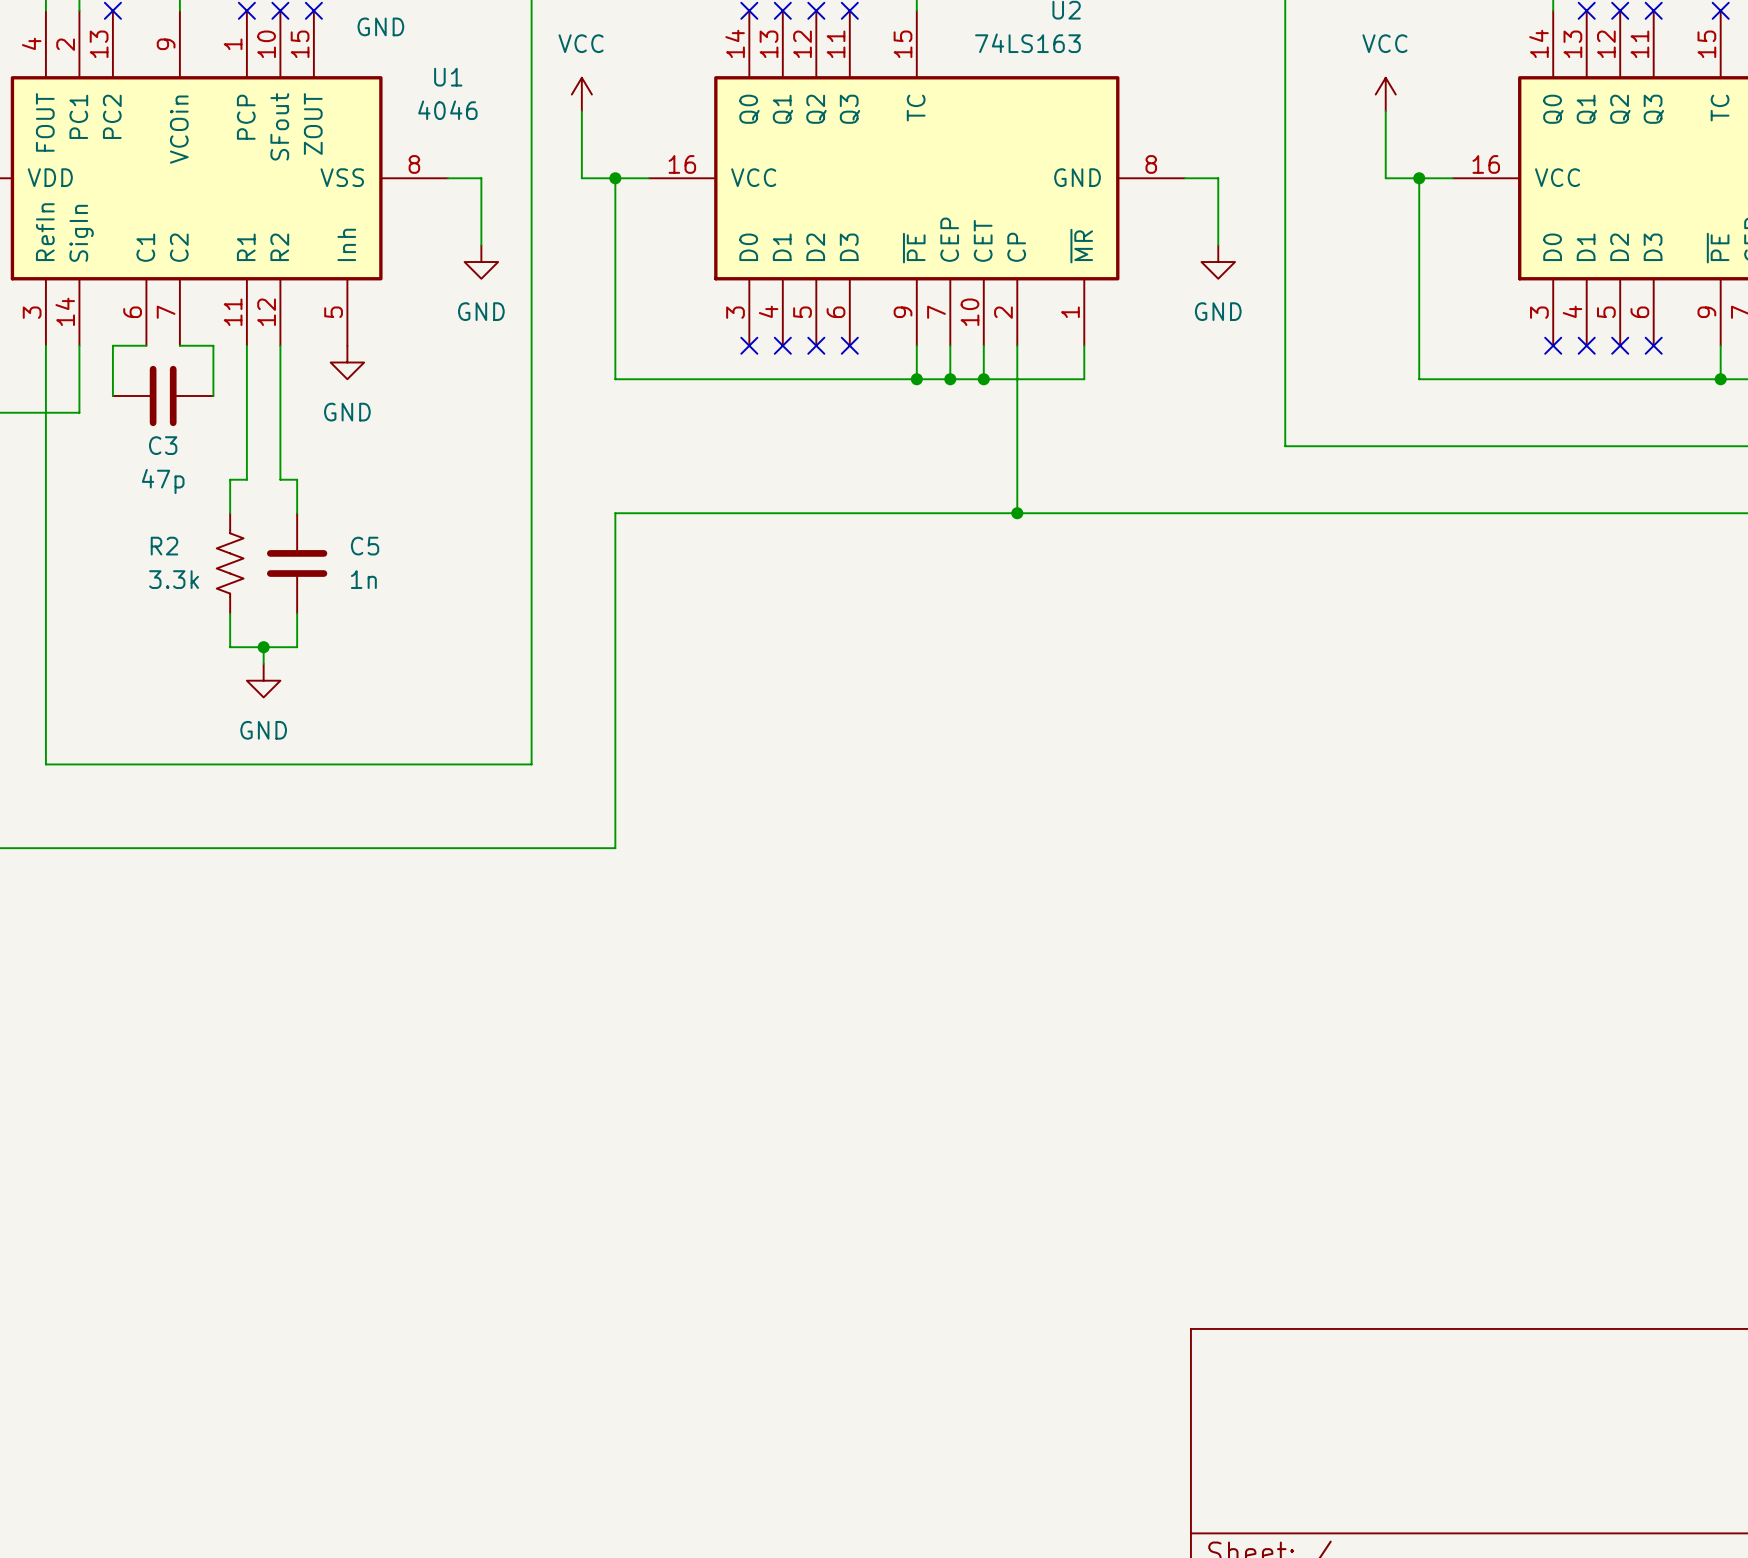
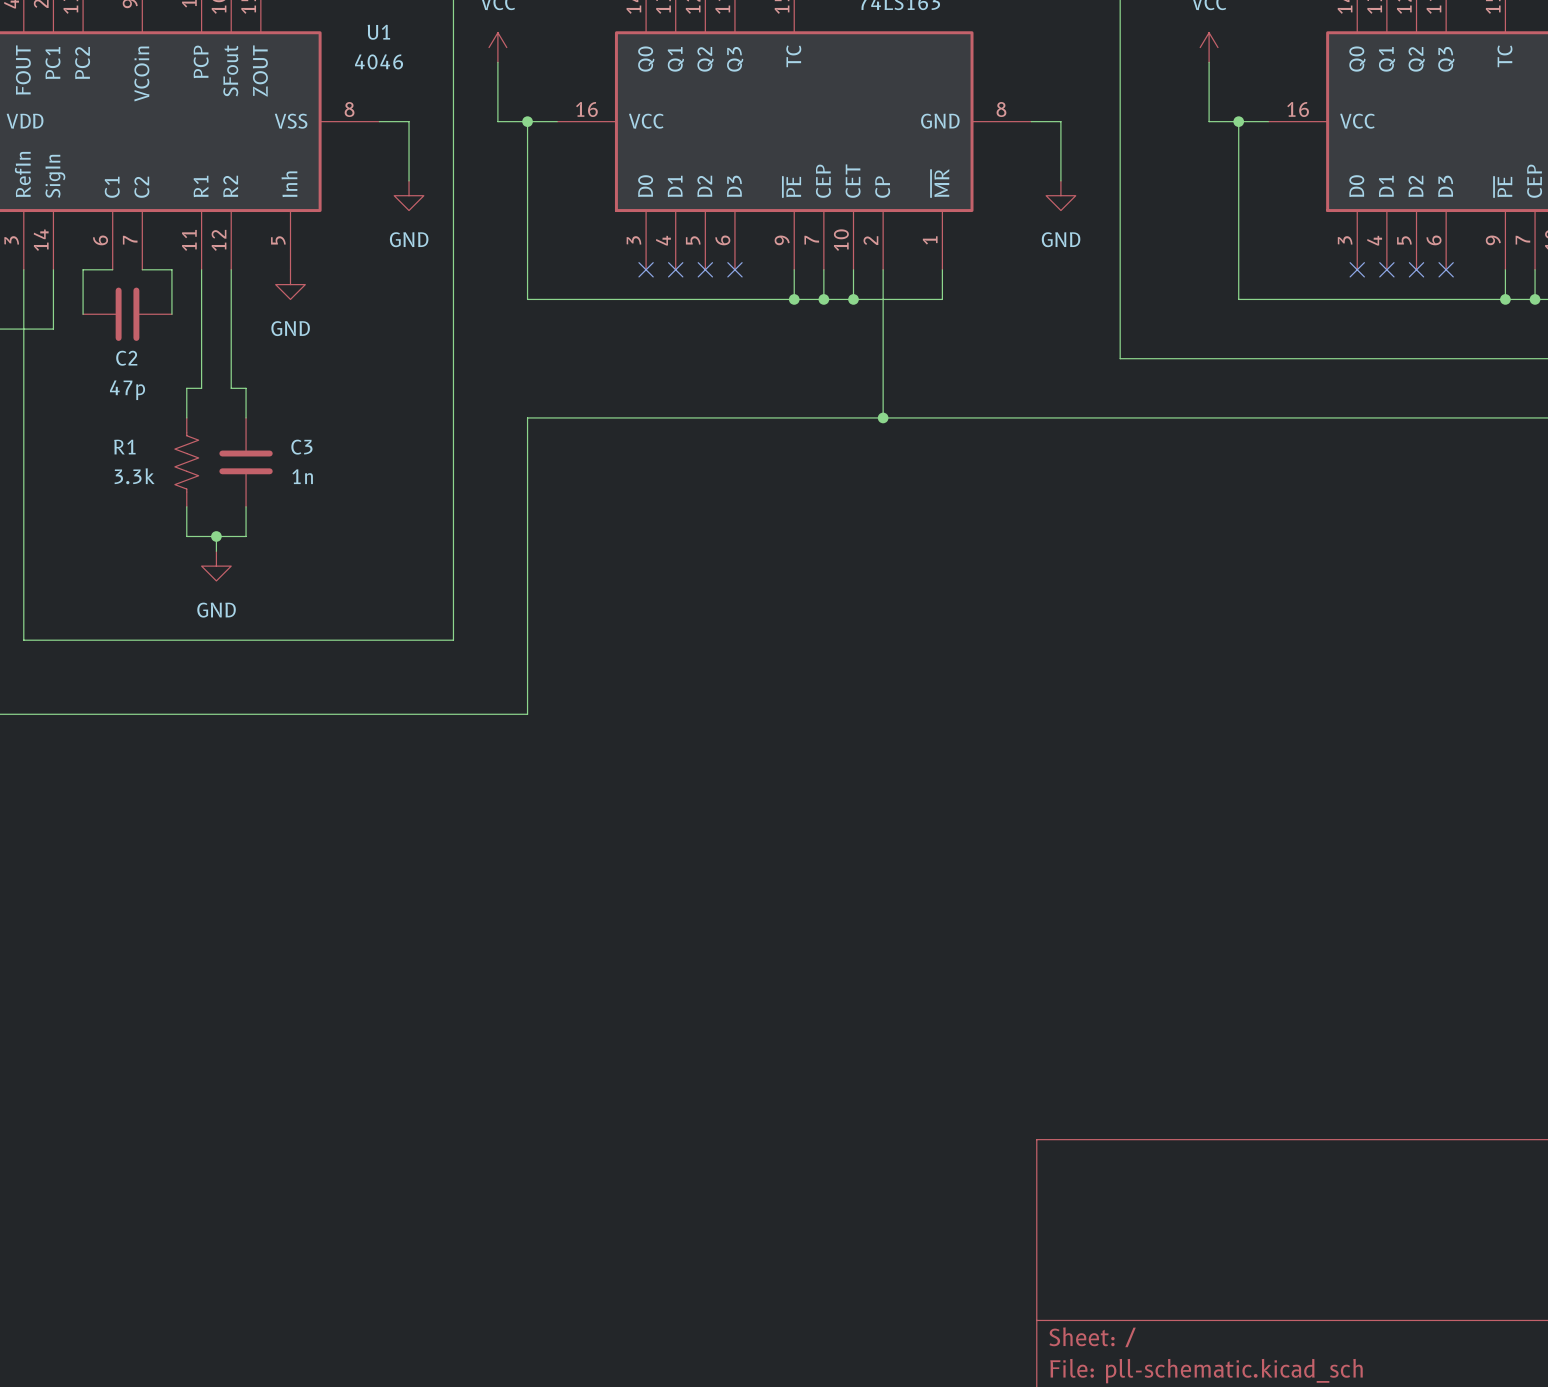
C3 name: C3 (163, 445) -> C2 (126, 358)
R2 name: R2 (164, 546) -> R1 (124, 447)
C5 name: C5 (365, 546) -> C3 (301, 447)

